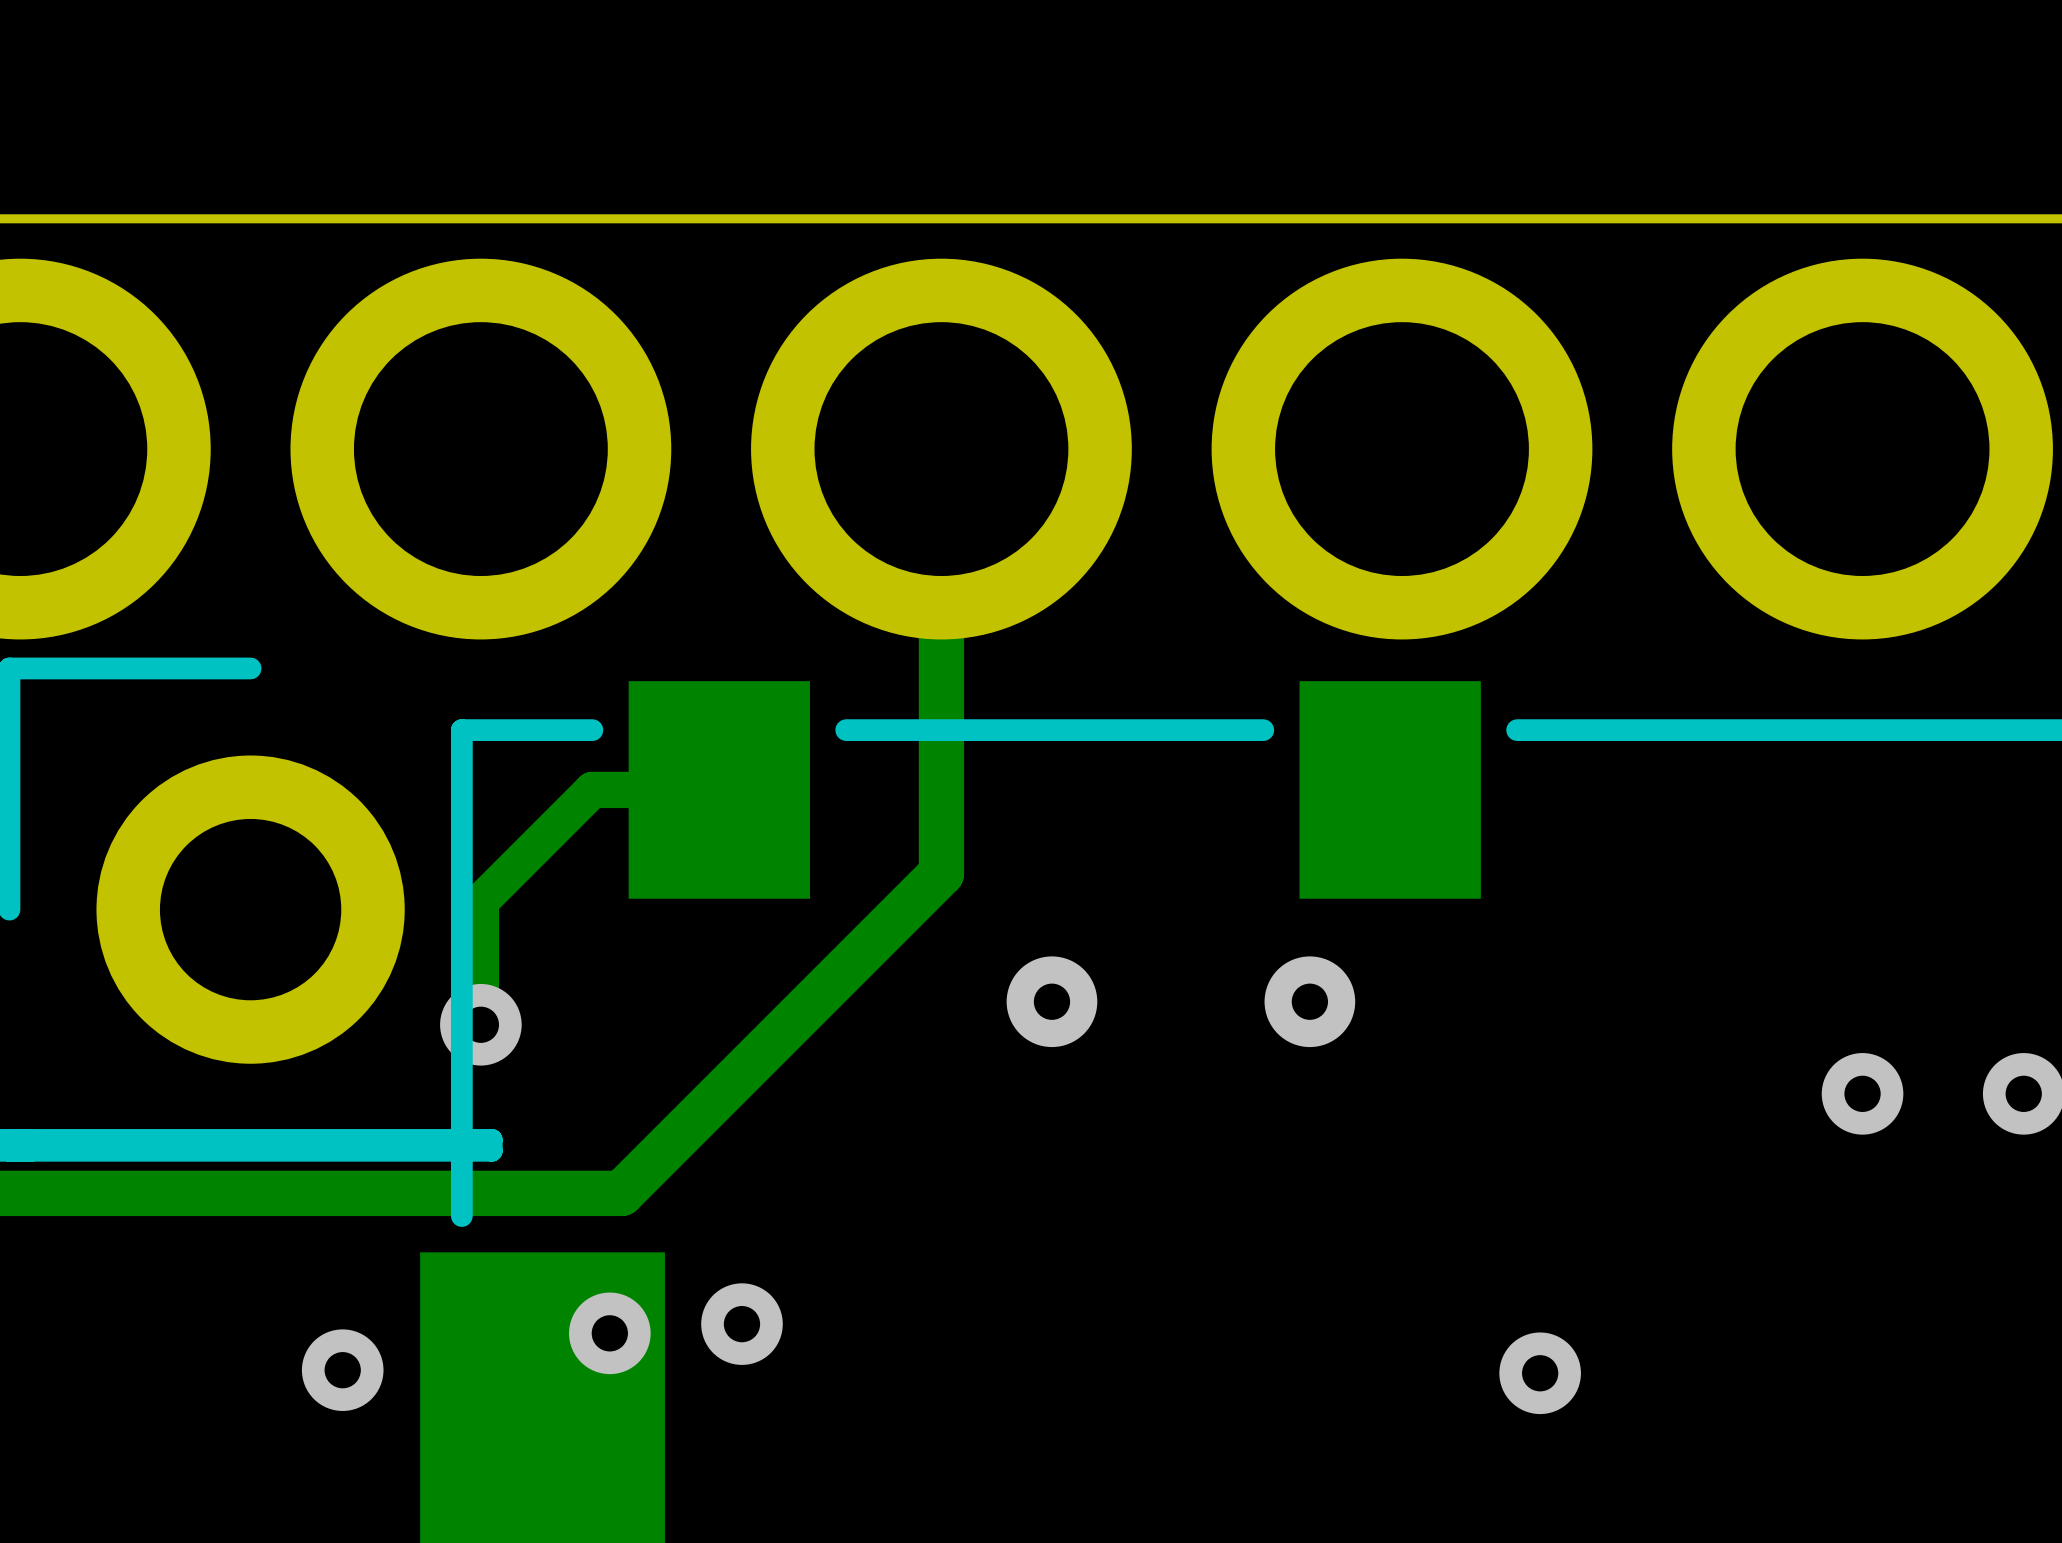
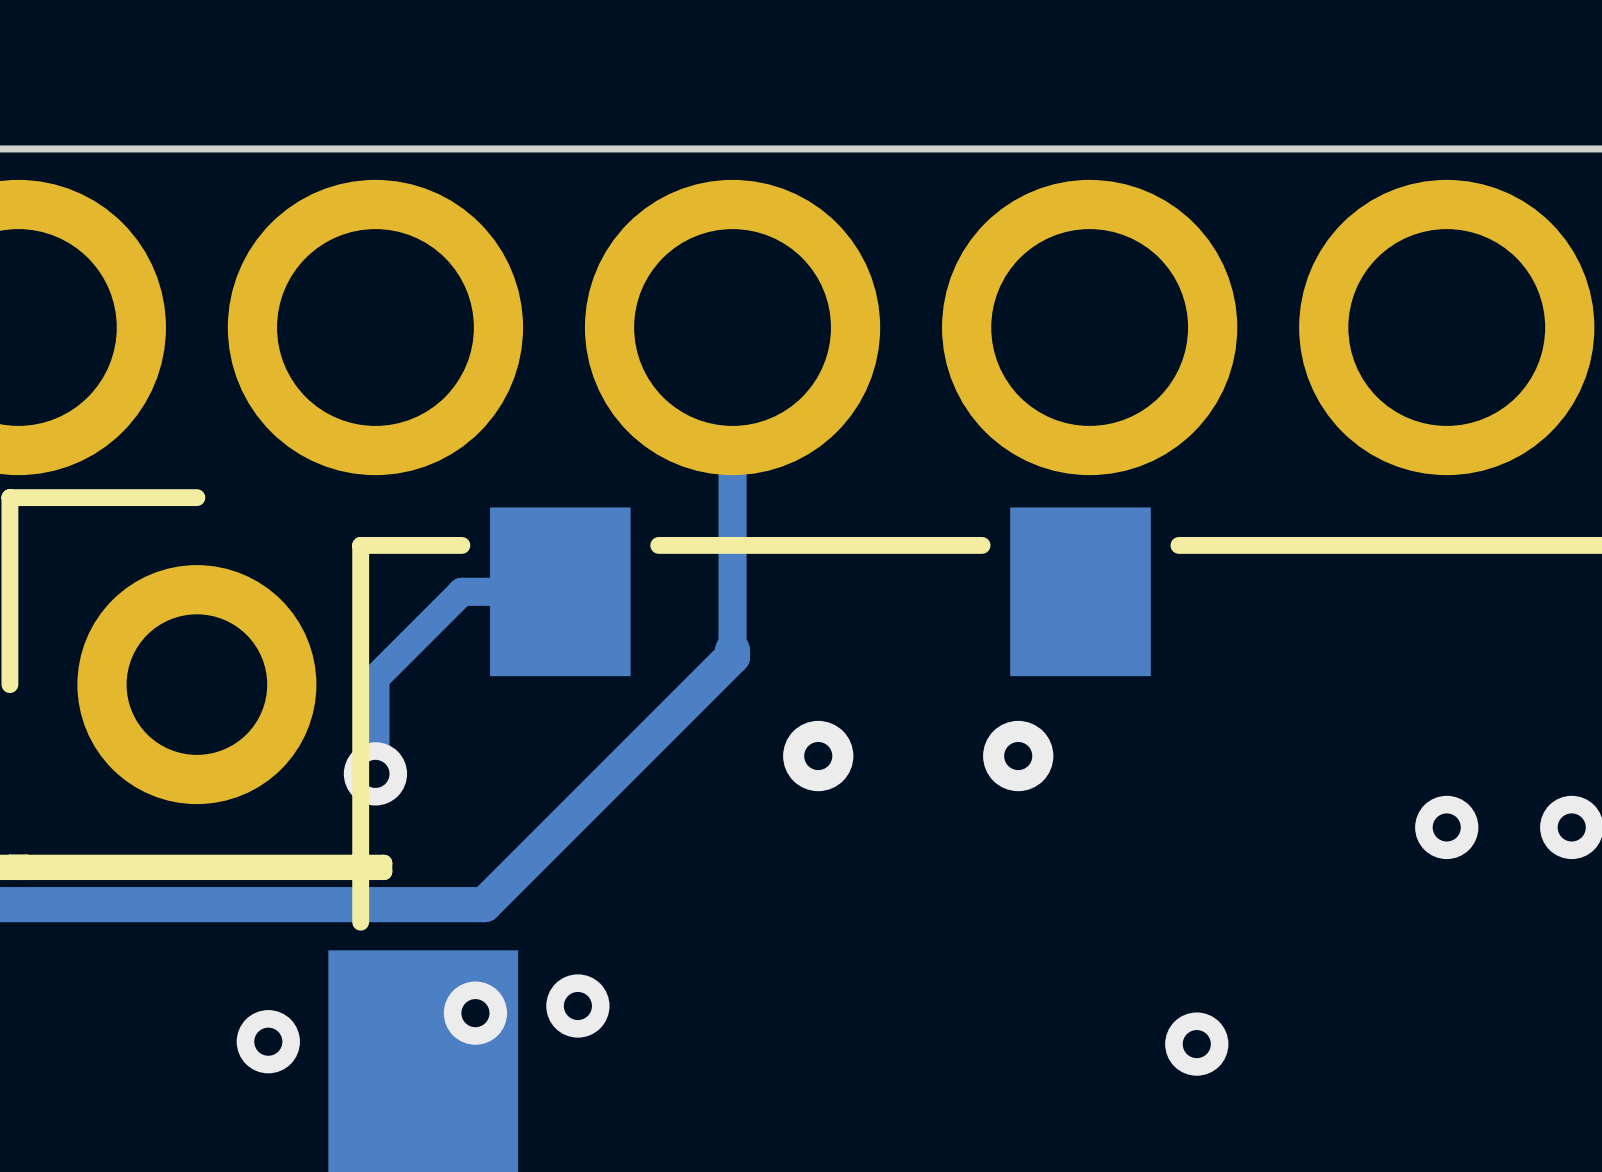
track width: thick (941, 449) (941, 865) -> thin (732, 327) (732, 650)

